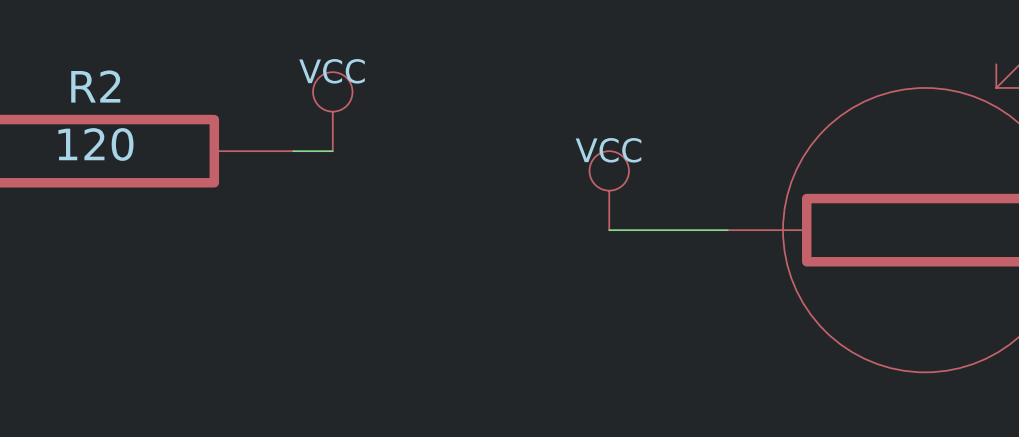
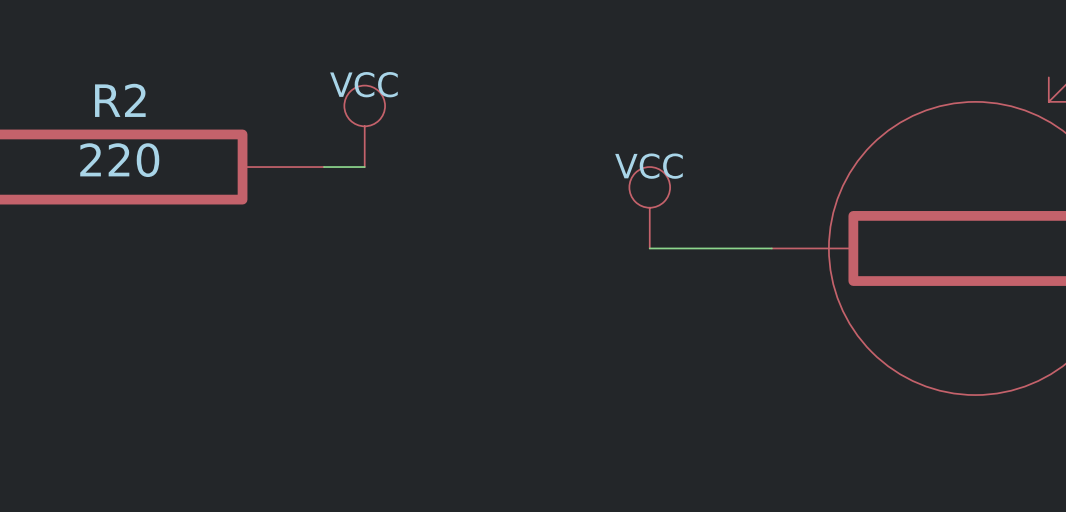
R2 value: 120 (95, 144) -> 220 (119, 160)

